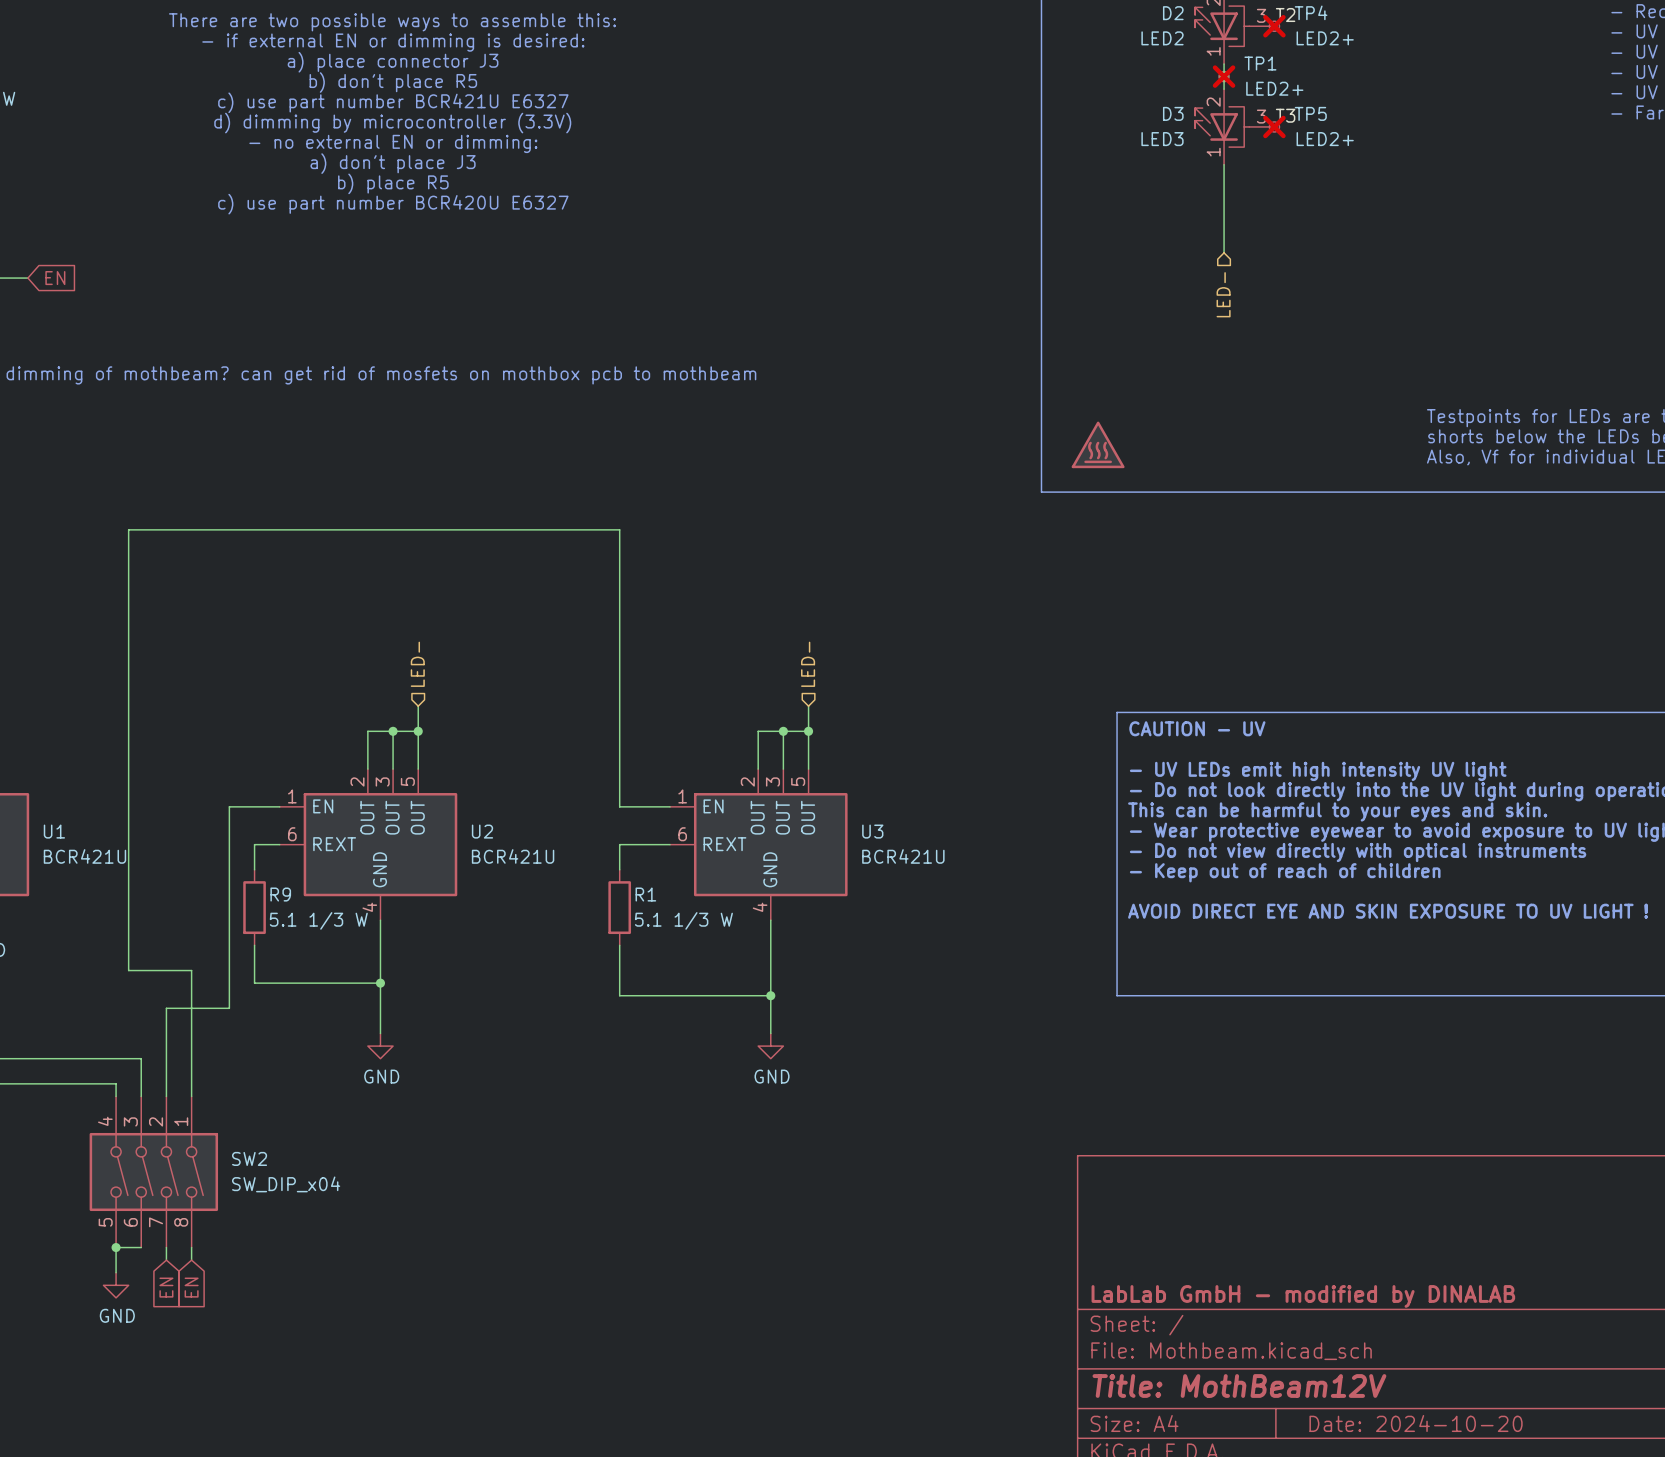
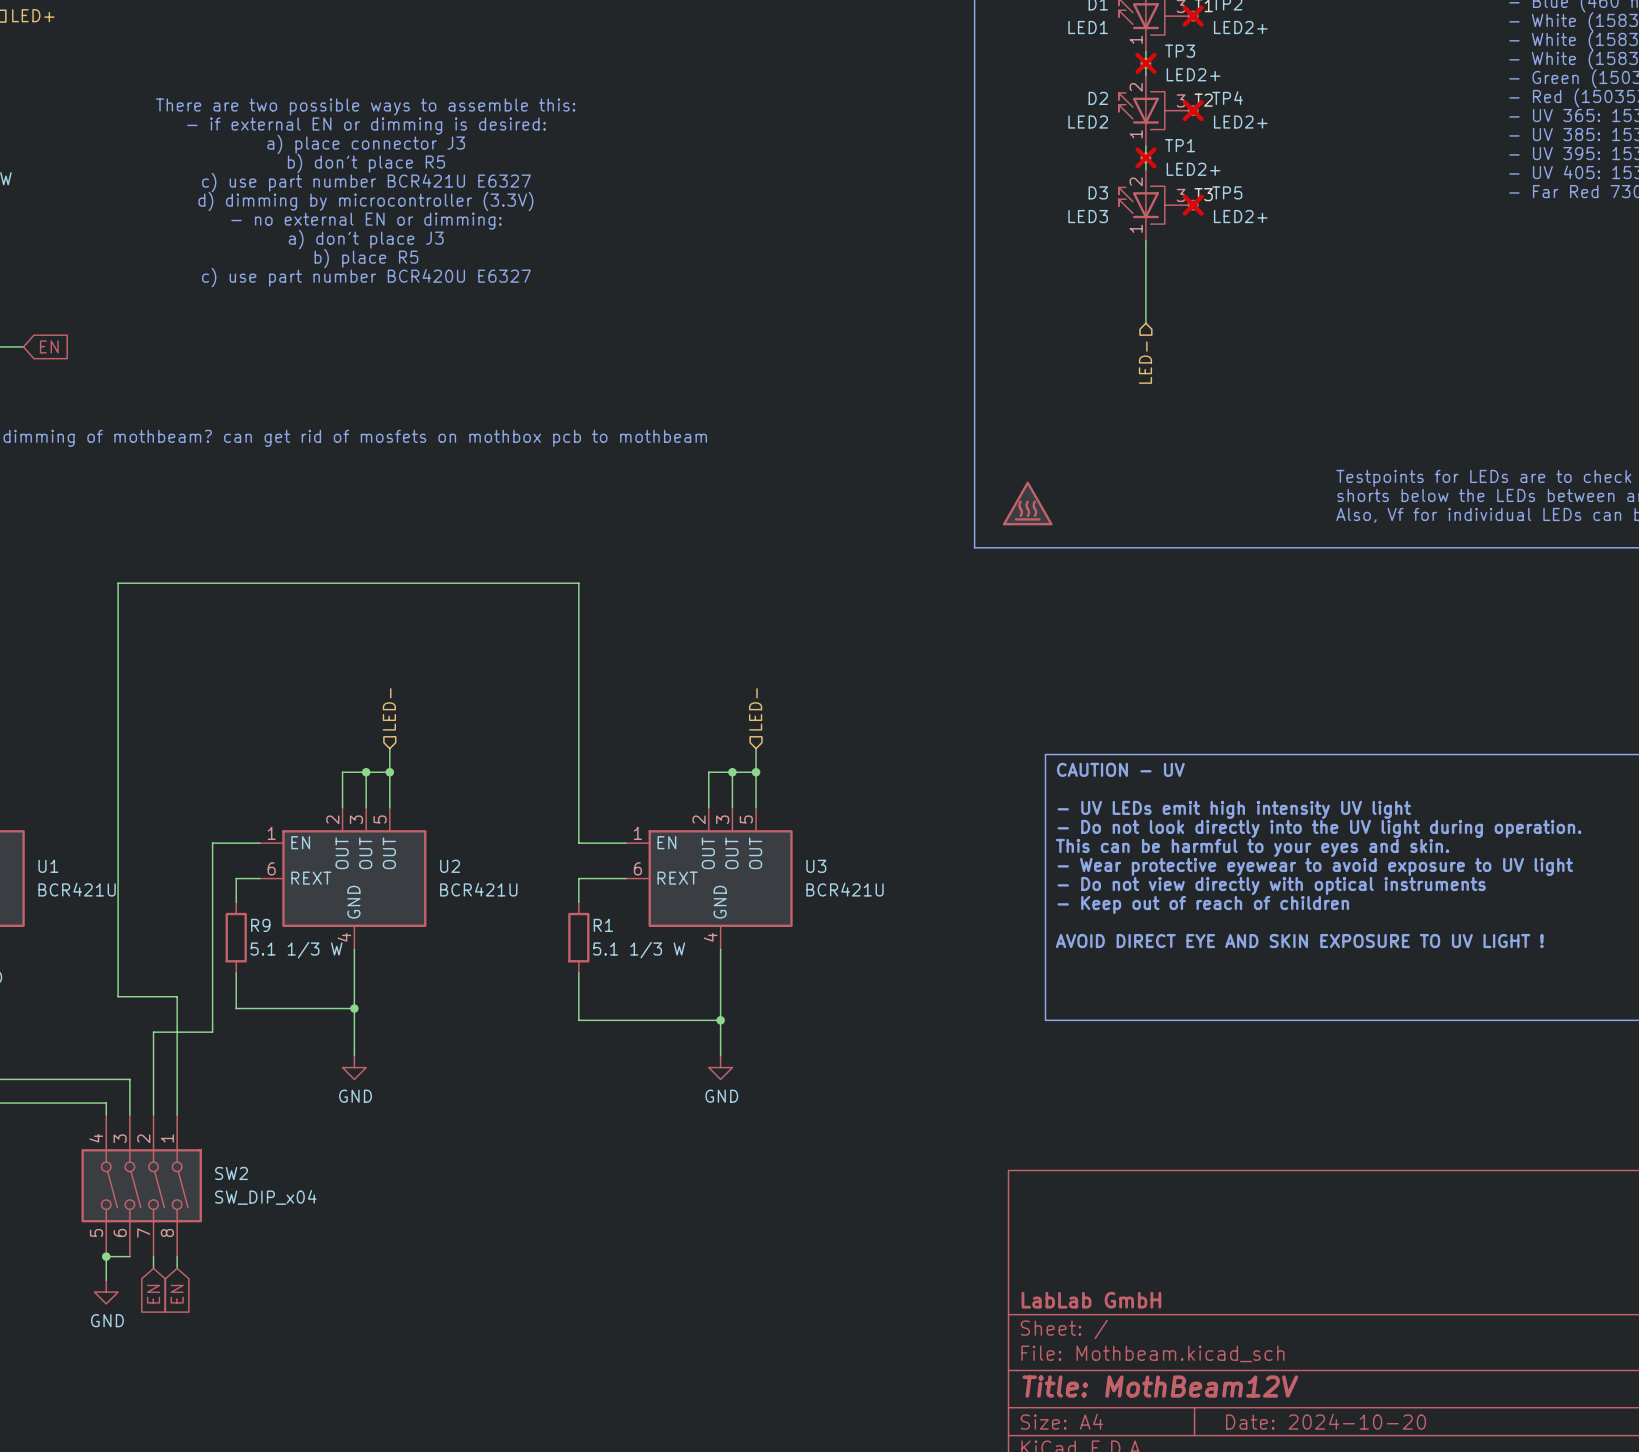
title block: LabLab GmbH - modified by DINALAB (1303, 1296) -> LabLab GmbH (1091, 1300)

